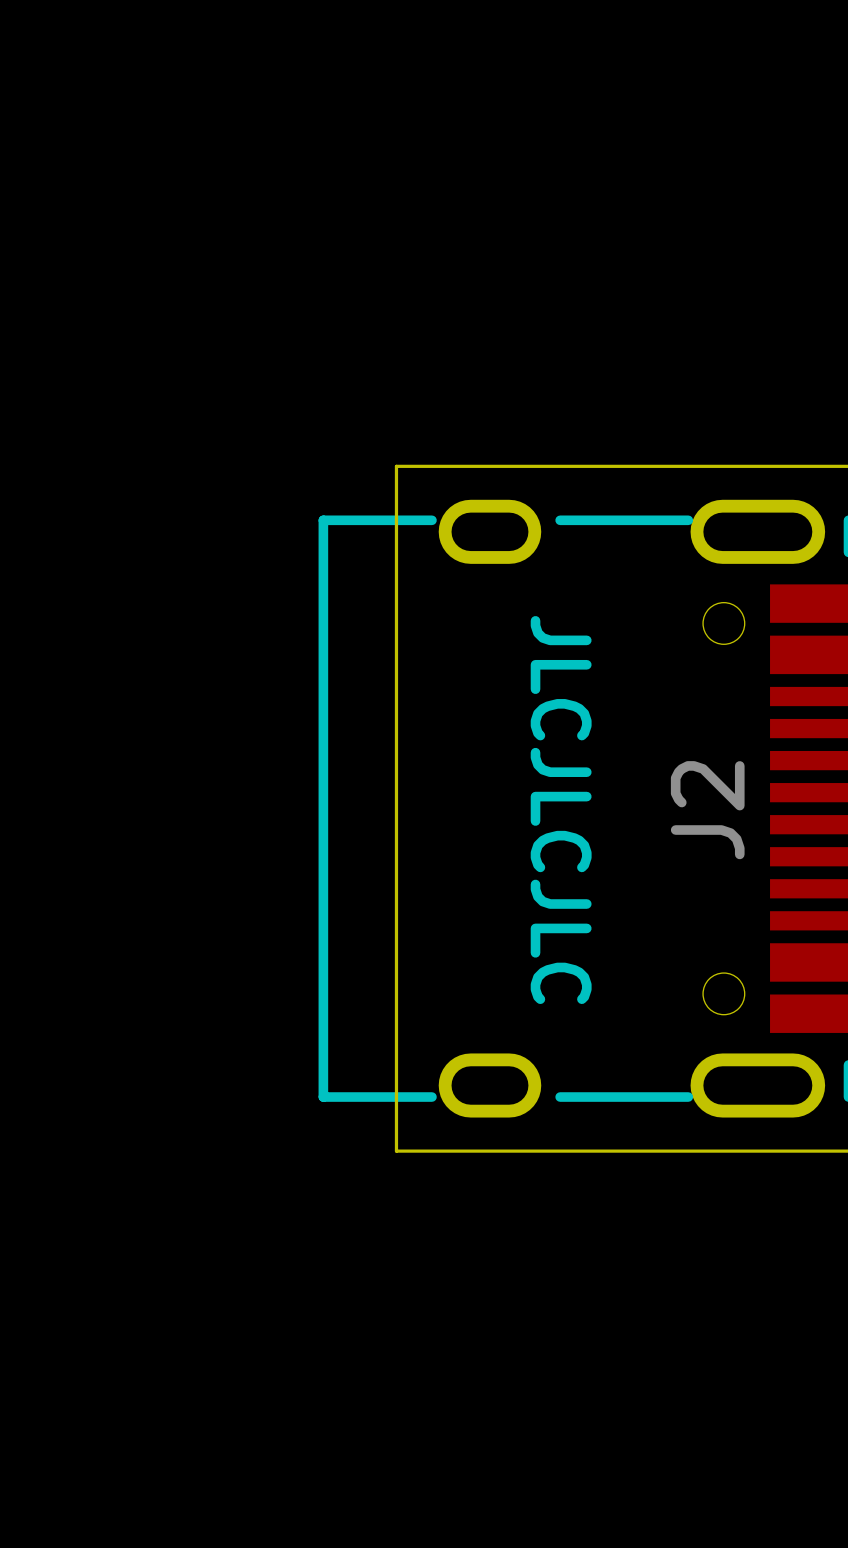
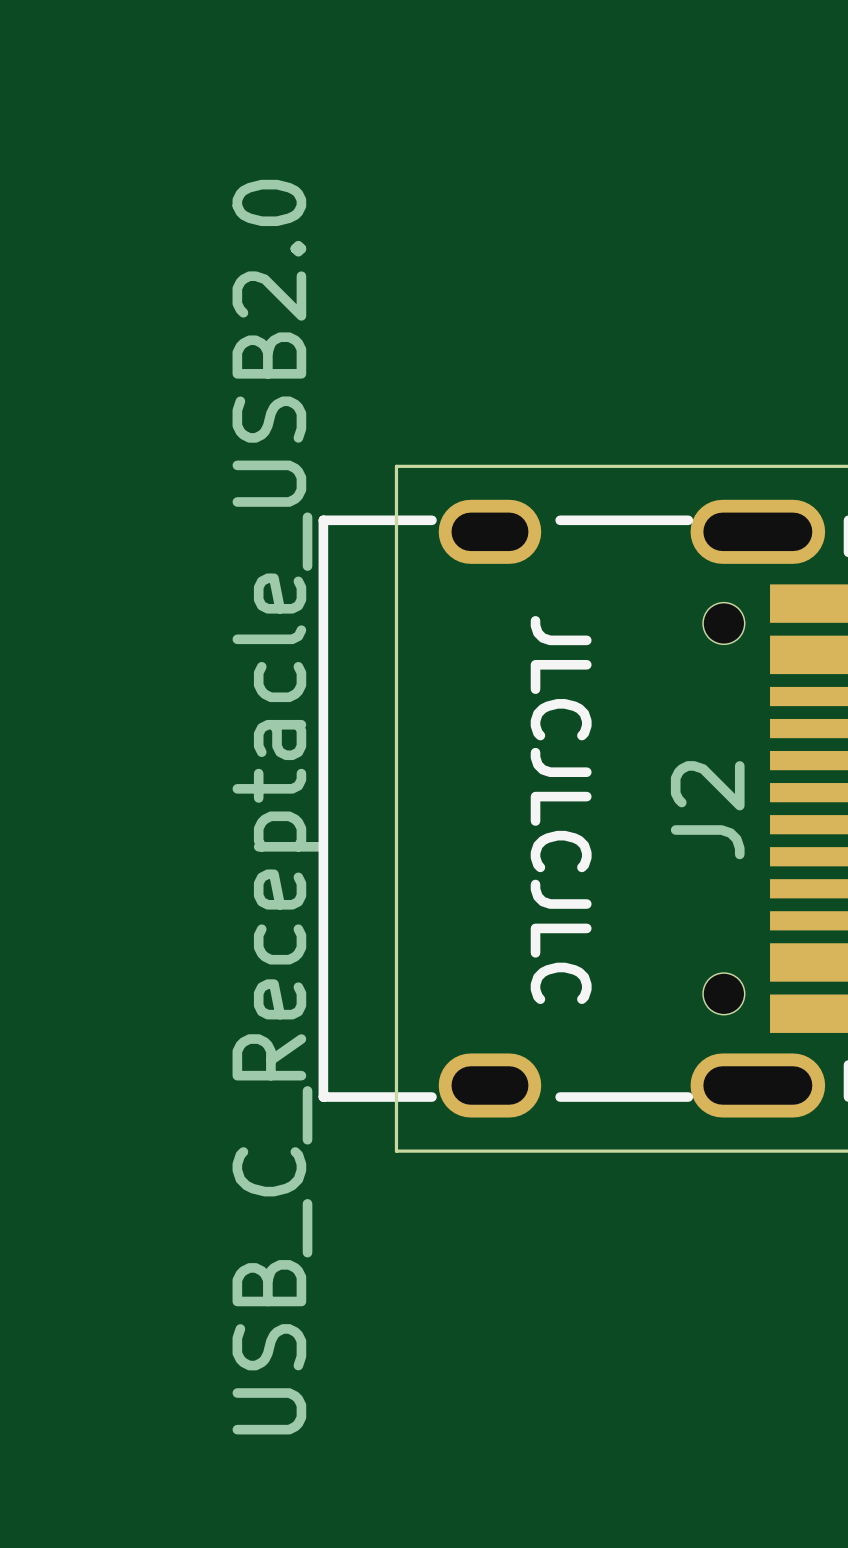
J2 value: none -> USB_C_Receptacle_USB2.0 (280, 807)

